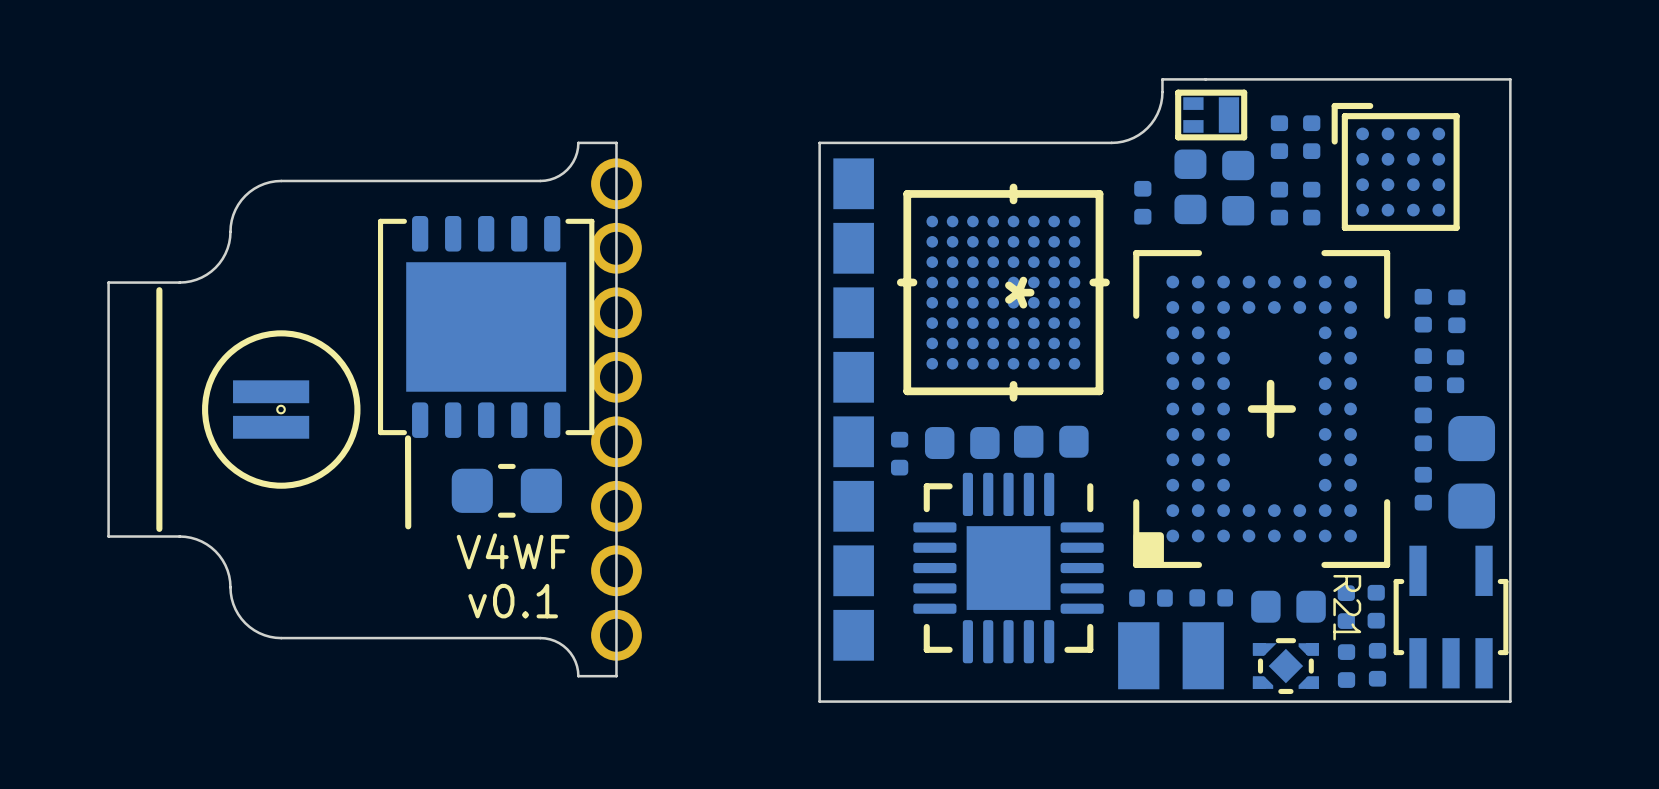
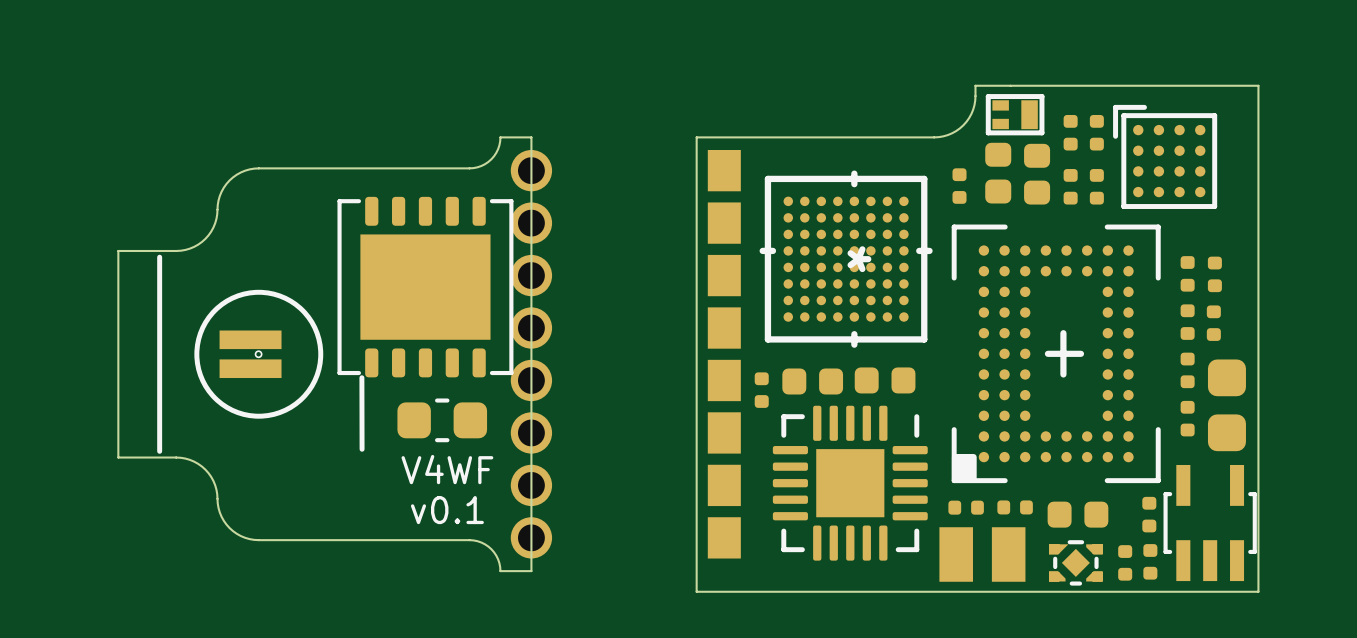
R21: (1346, 607) -> none

